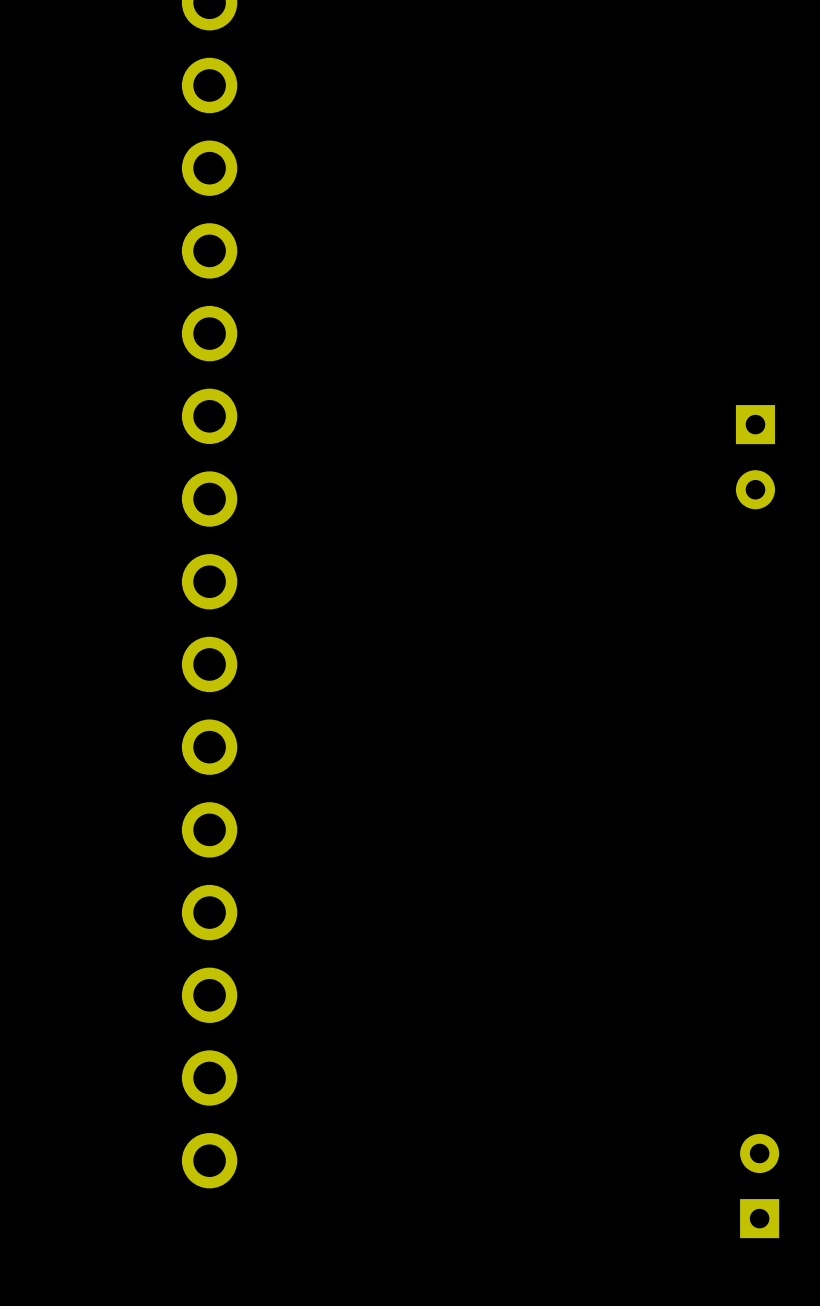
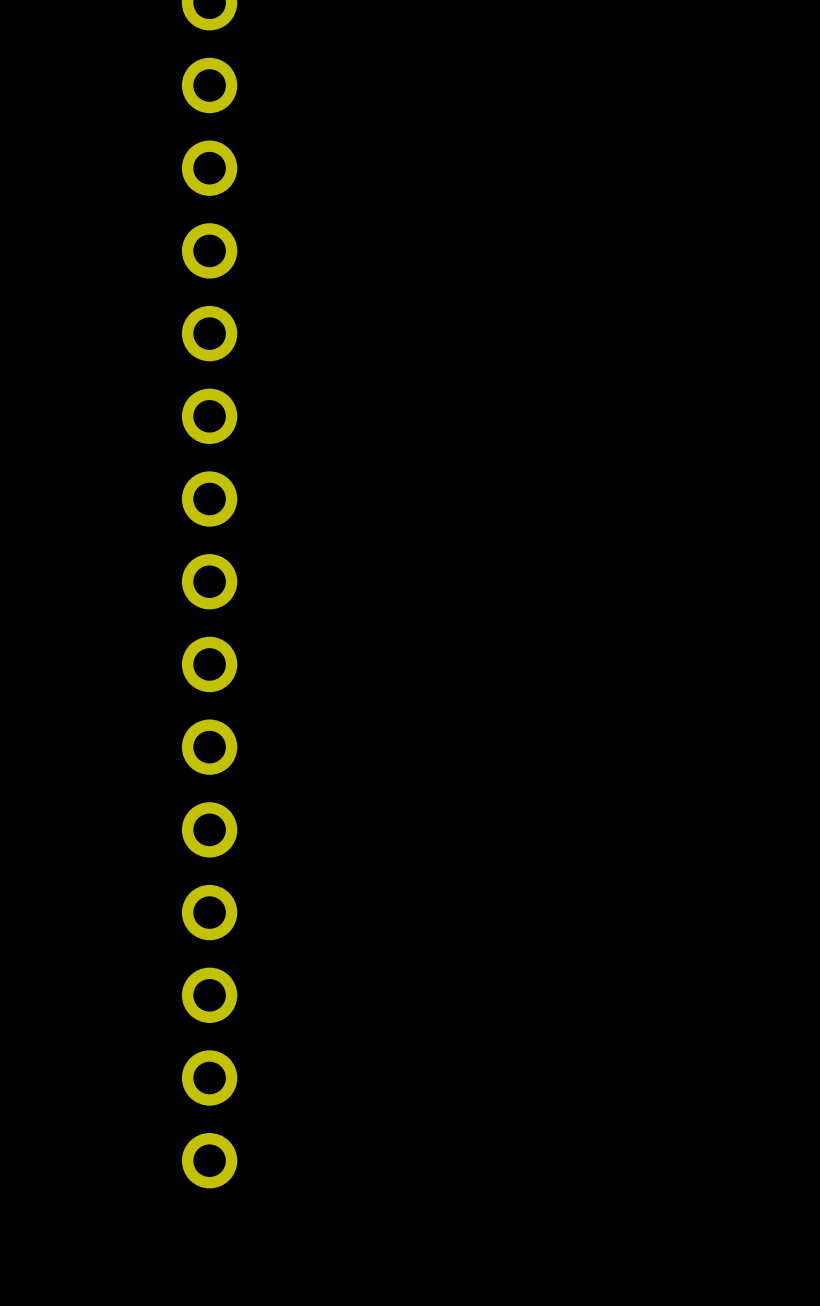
part: (755, 457) -> none
part: (759, 1186) -> none

